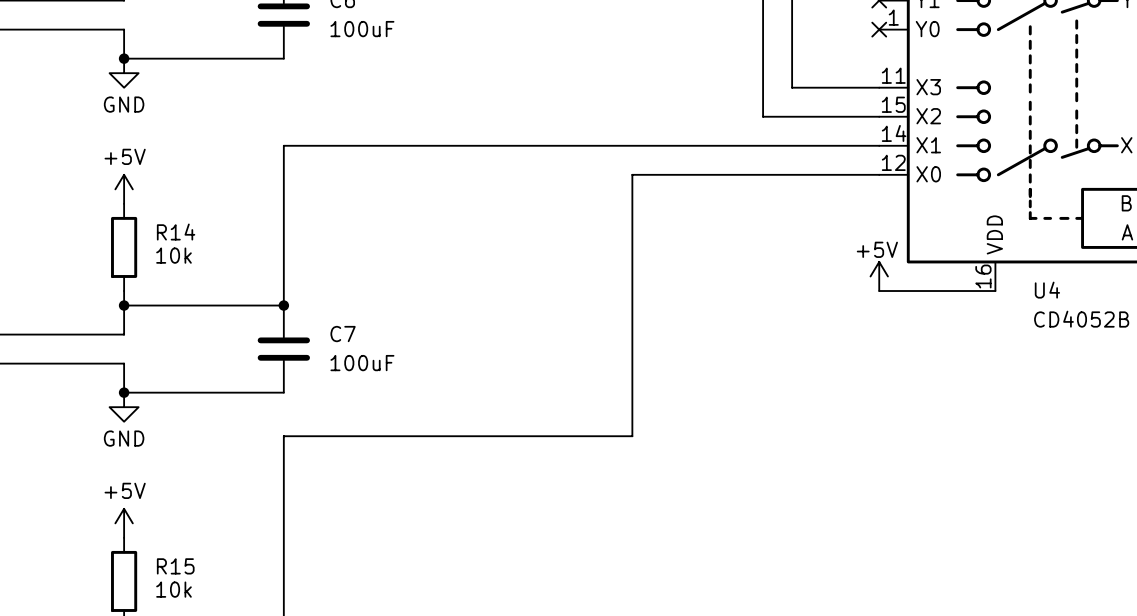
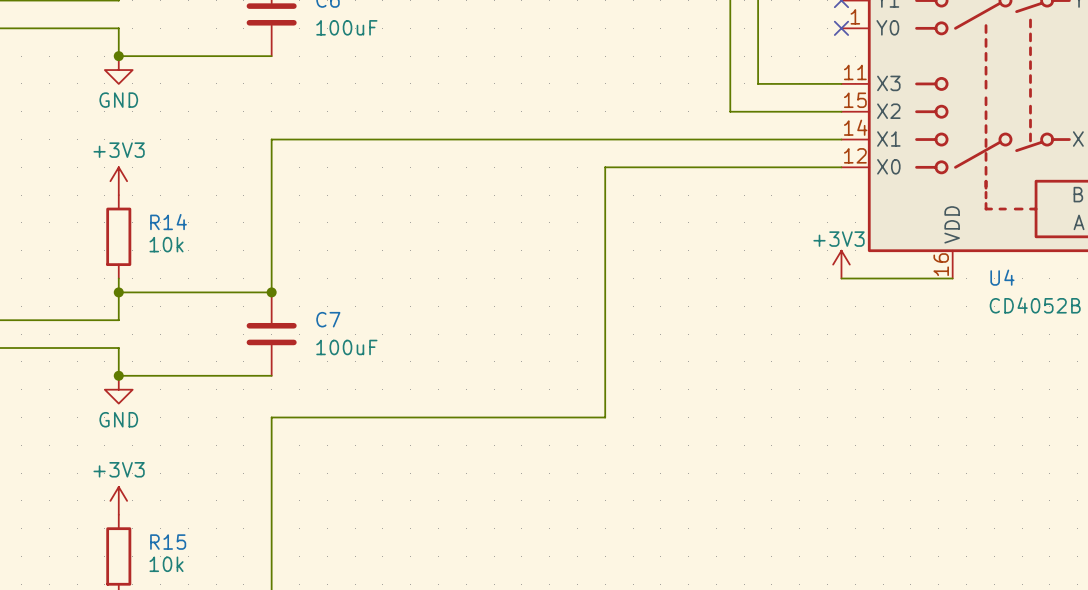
power symbol: +5V (124, 189) -> +3V3 (118, 181)
power symbol: +5V (879, 276) -> +3V3 (841, 264)
power symbol: +5V (124, 523) -> +3V3 (118, 500)

